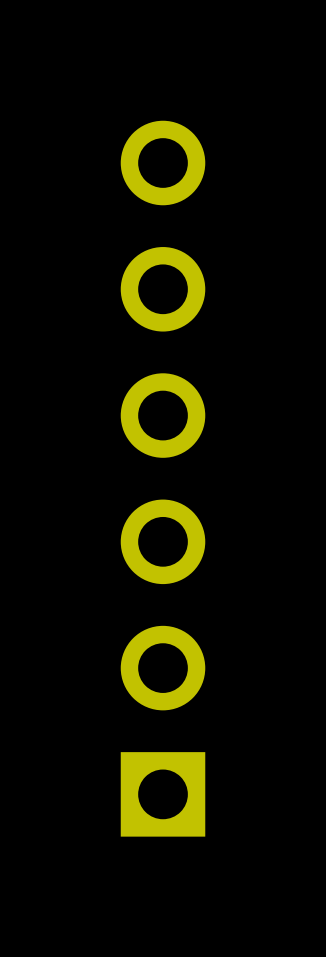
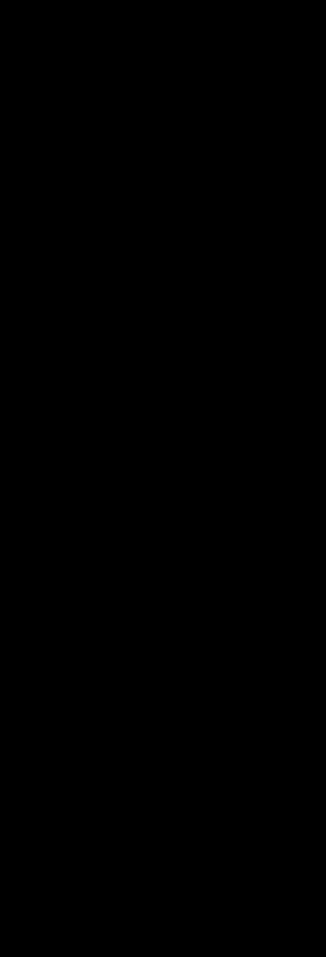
part: (163, 478) -> none

